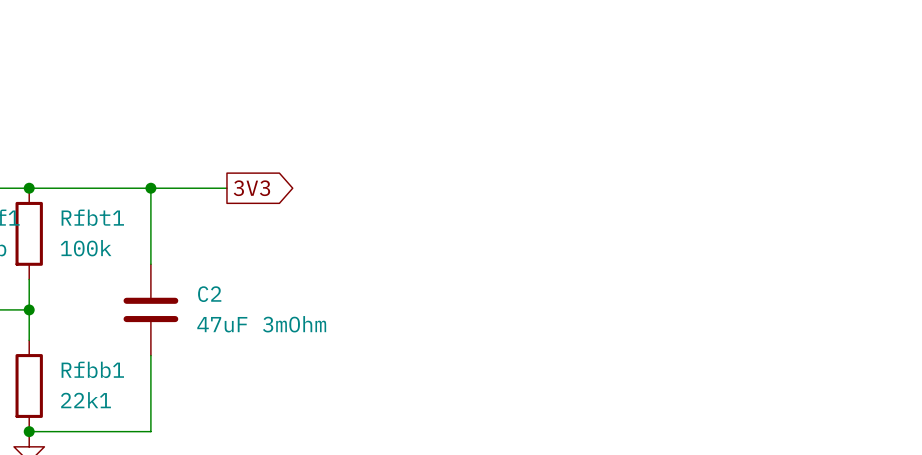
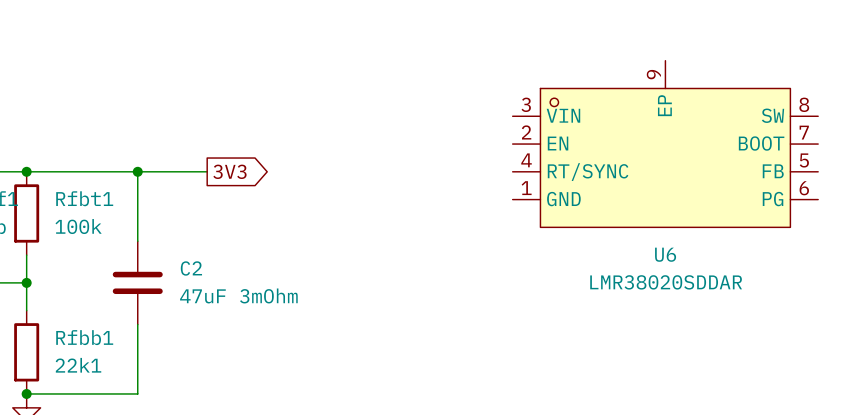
U6: none -> LMR38020SDDAR (665, 144)

